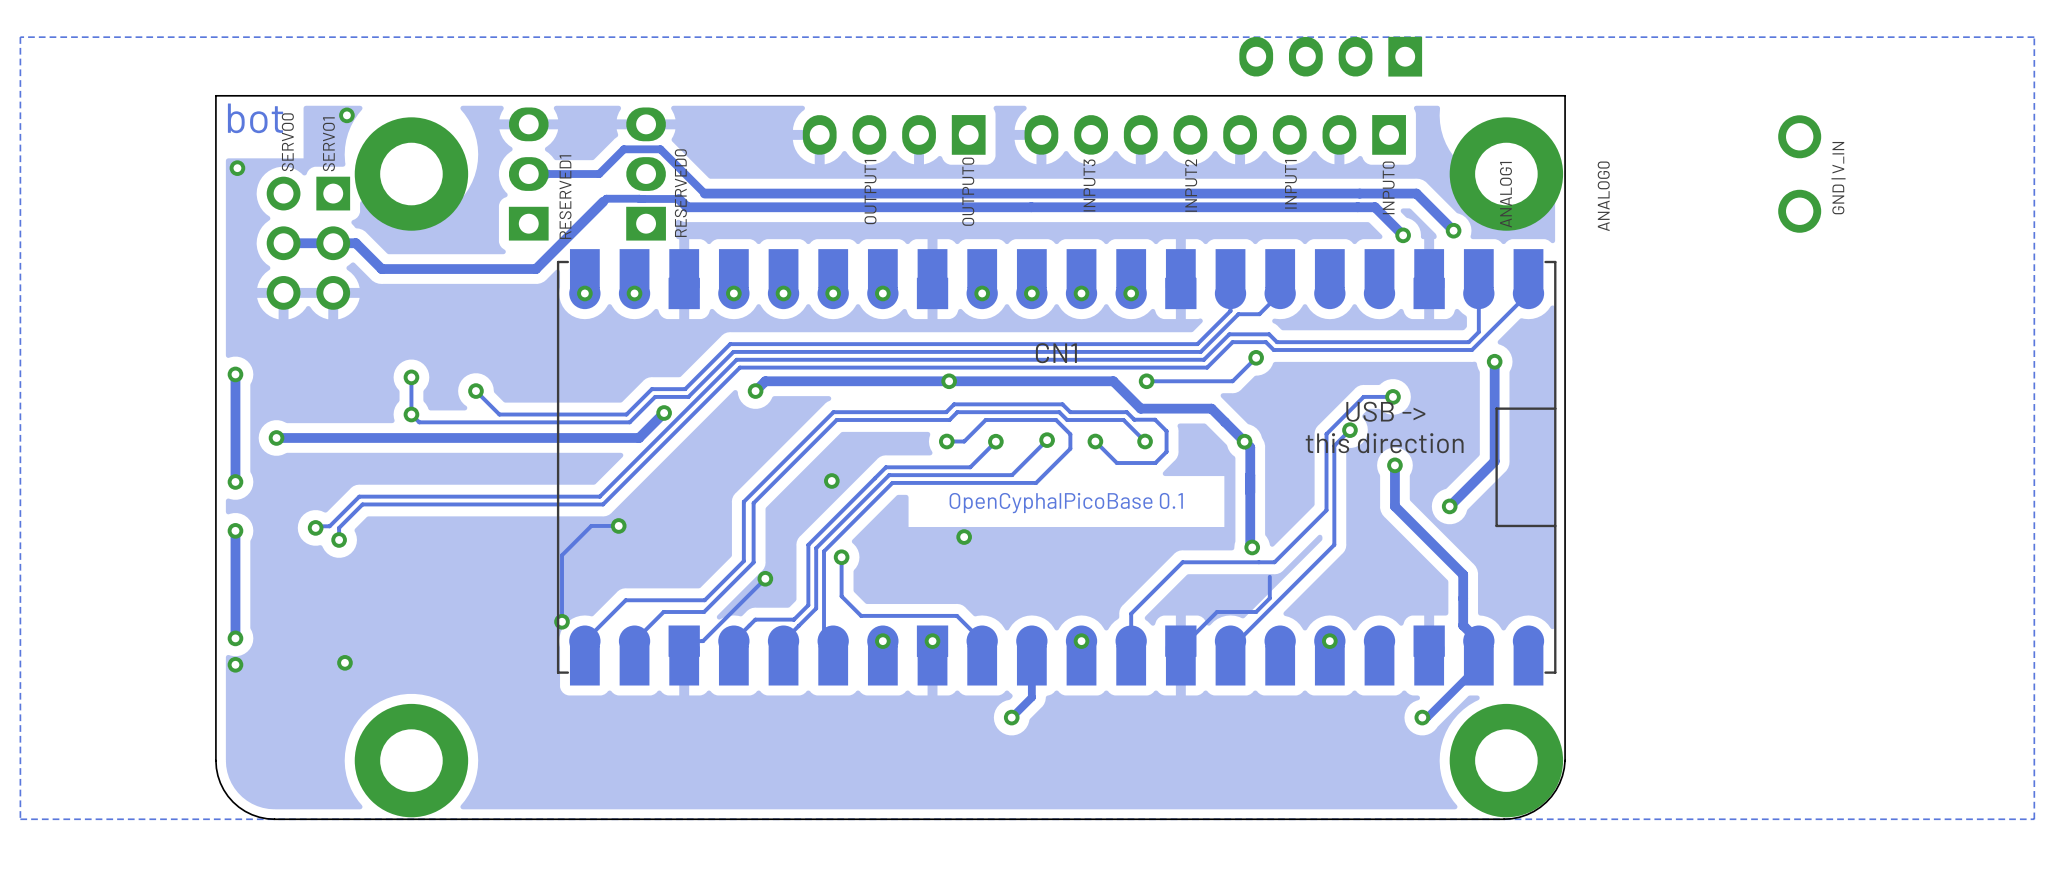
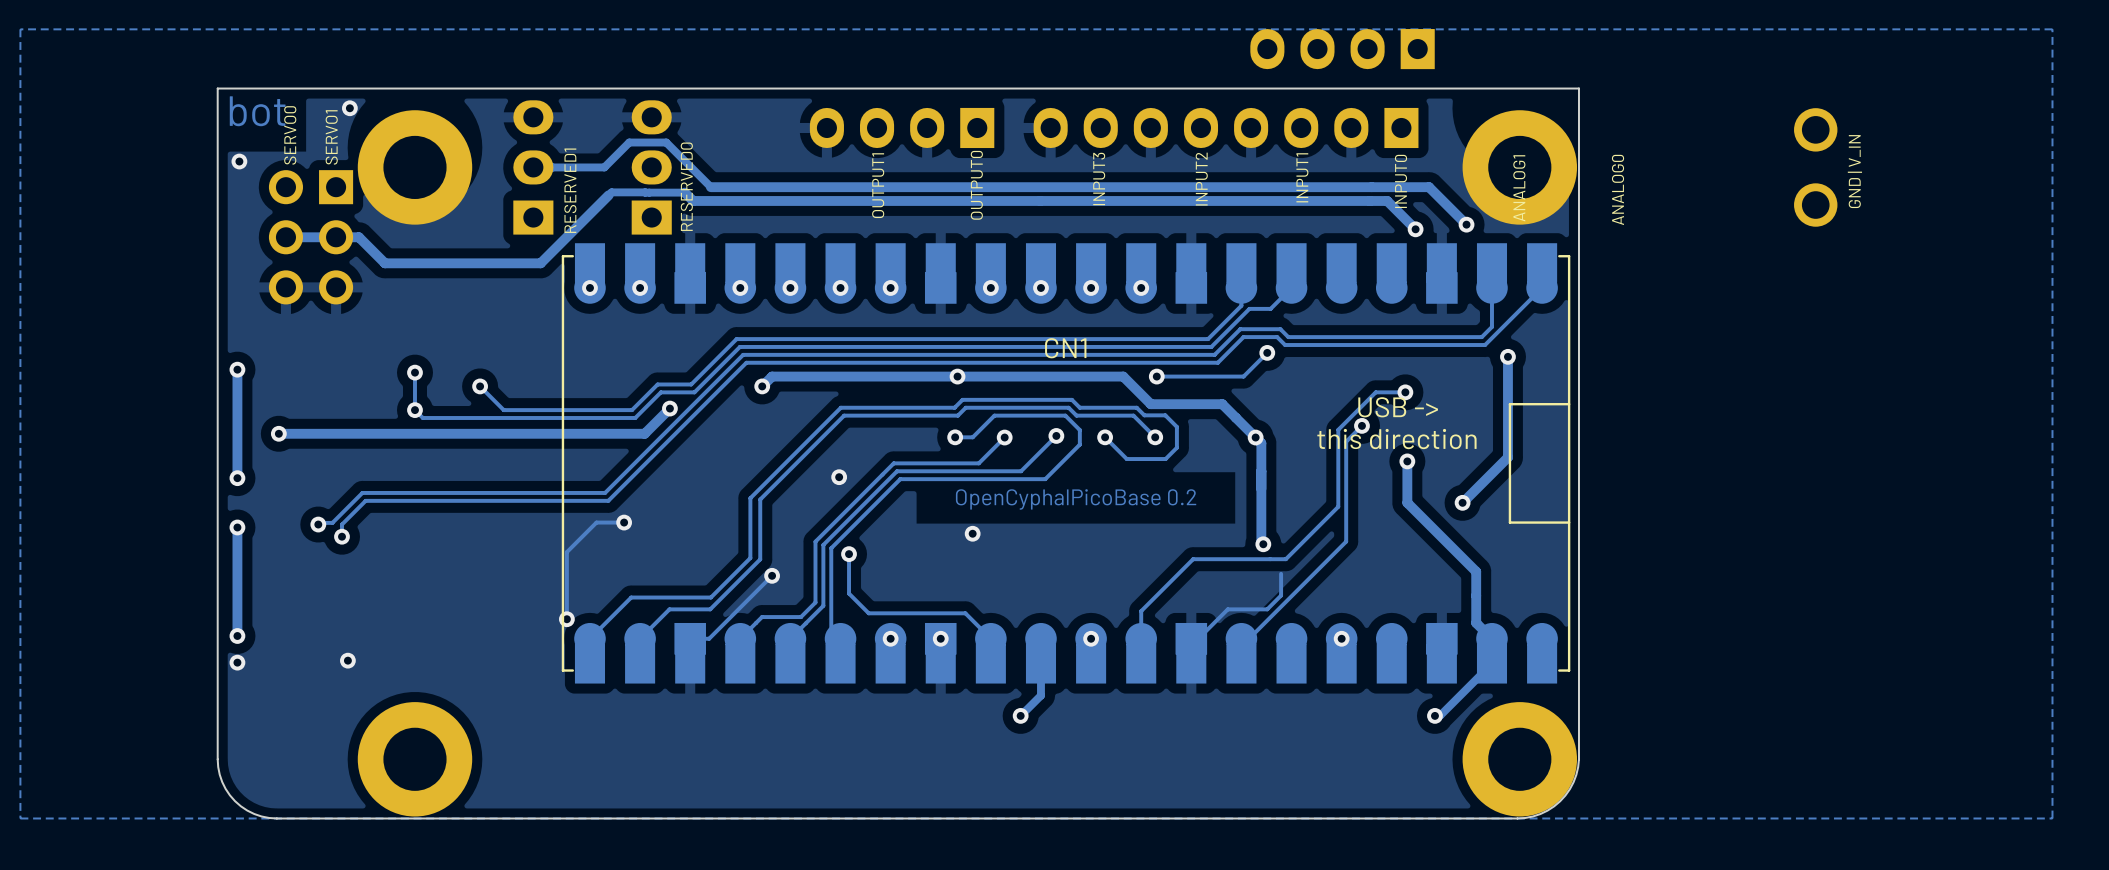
text: OpenCyphalPicoBase 0.1 (1066, 503) -> OpenCyphalPicoBase 0.2 (1076, 499)

